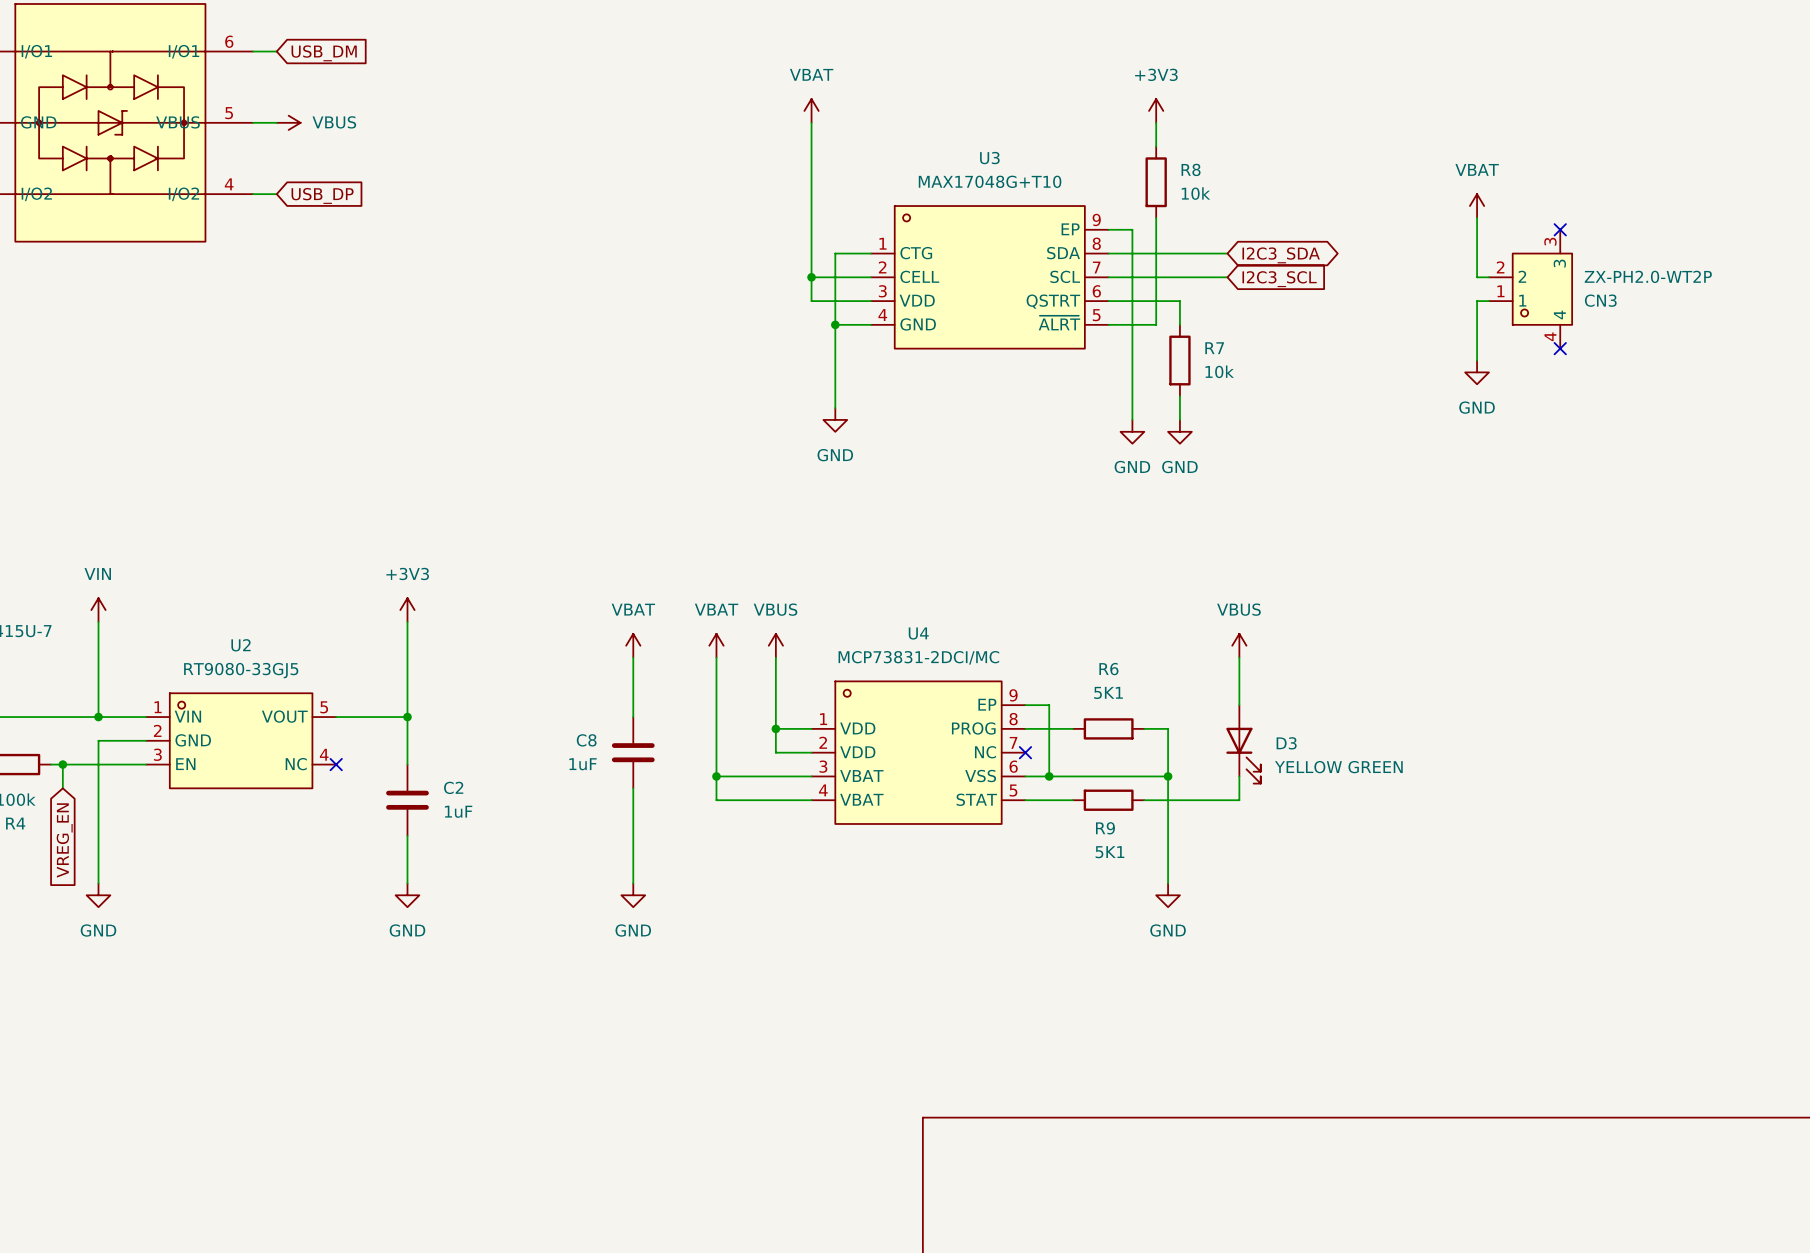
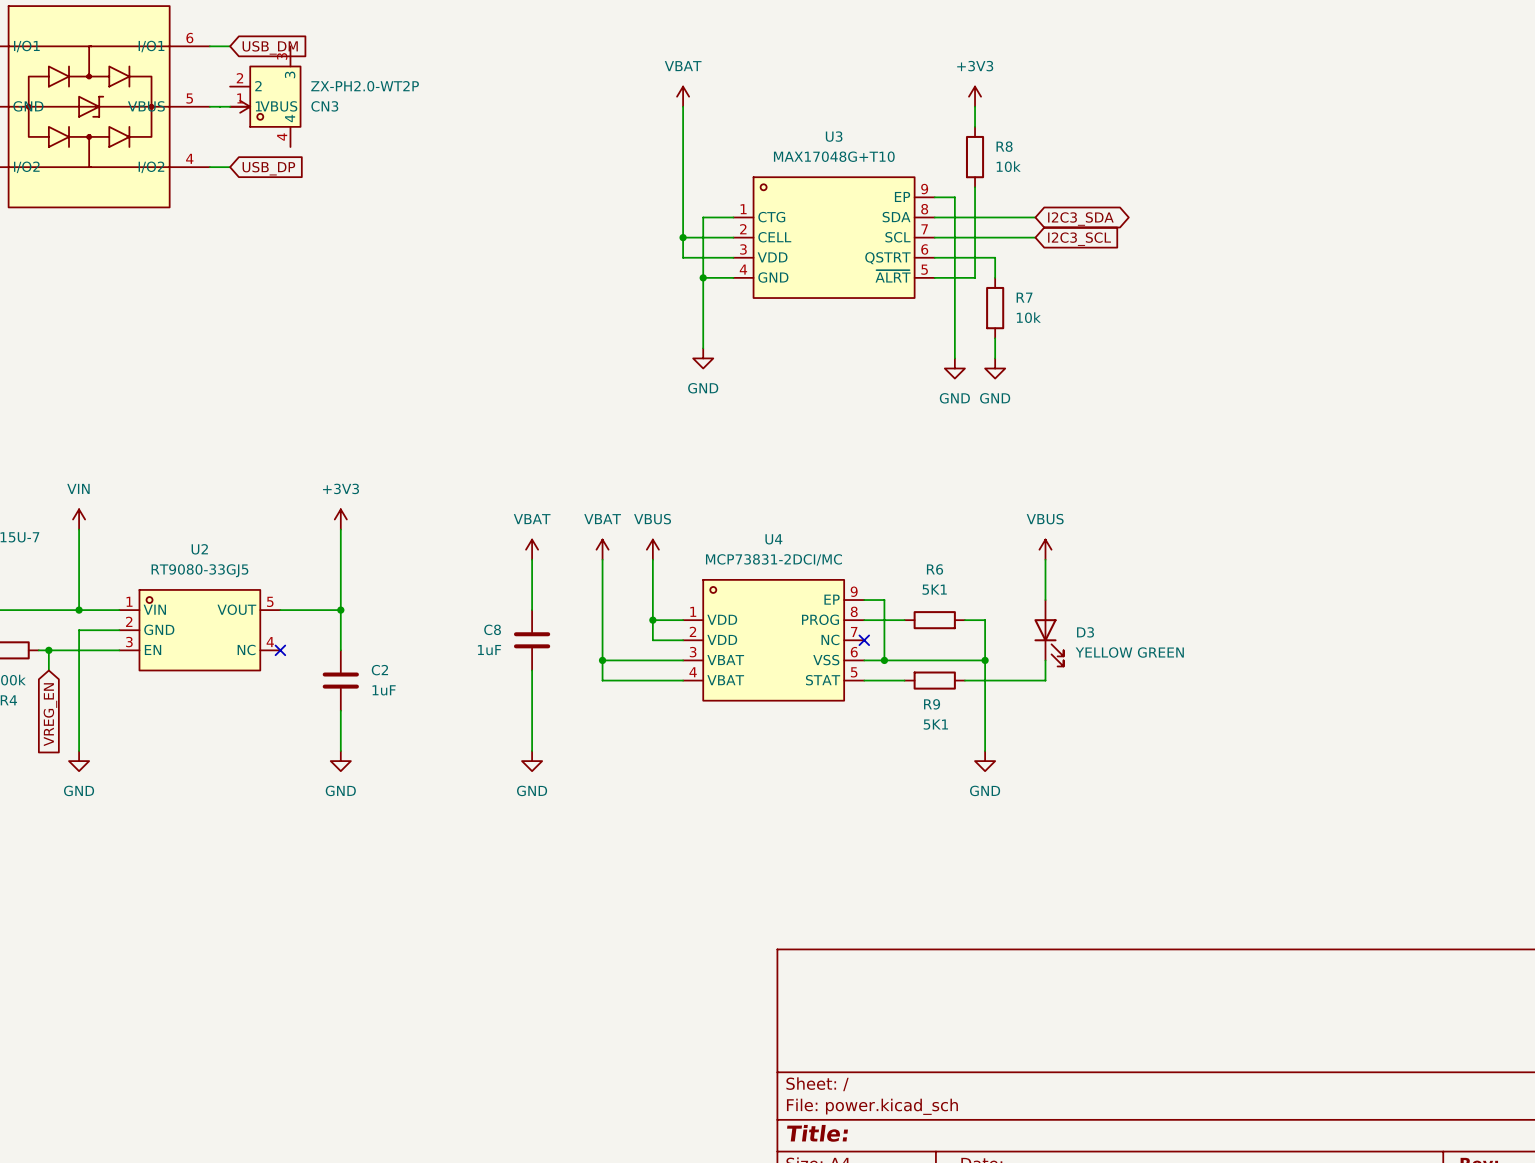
power symbol: VBAT (1477, 206) -> none
wire: (1477, 217) (1477, 277) (1488, 277) -> none
no-connect mark: (1560, 229) -> none
CN3 position: (1530, 289) -> (265, 96)
wire: (1488, 301) (1477, 301) (1477, 360) -> none
no-connect mark: (1560, 348) -> none
power symbol: GND (1477, 372) -> none

